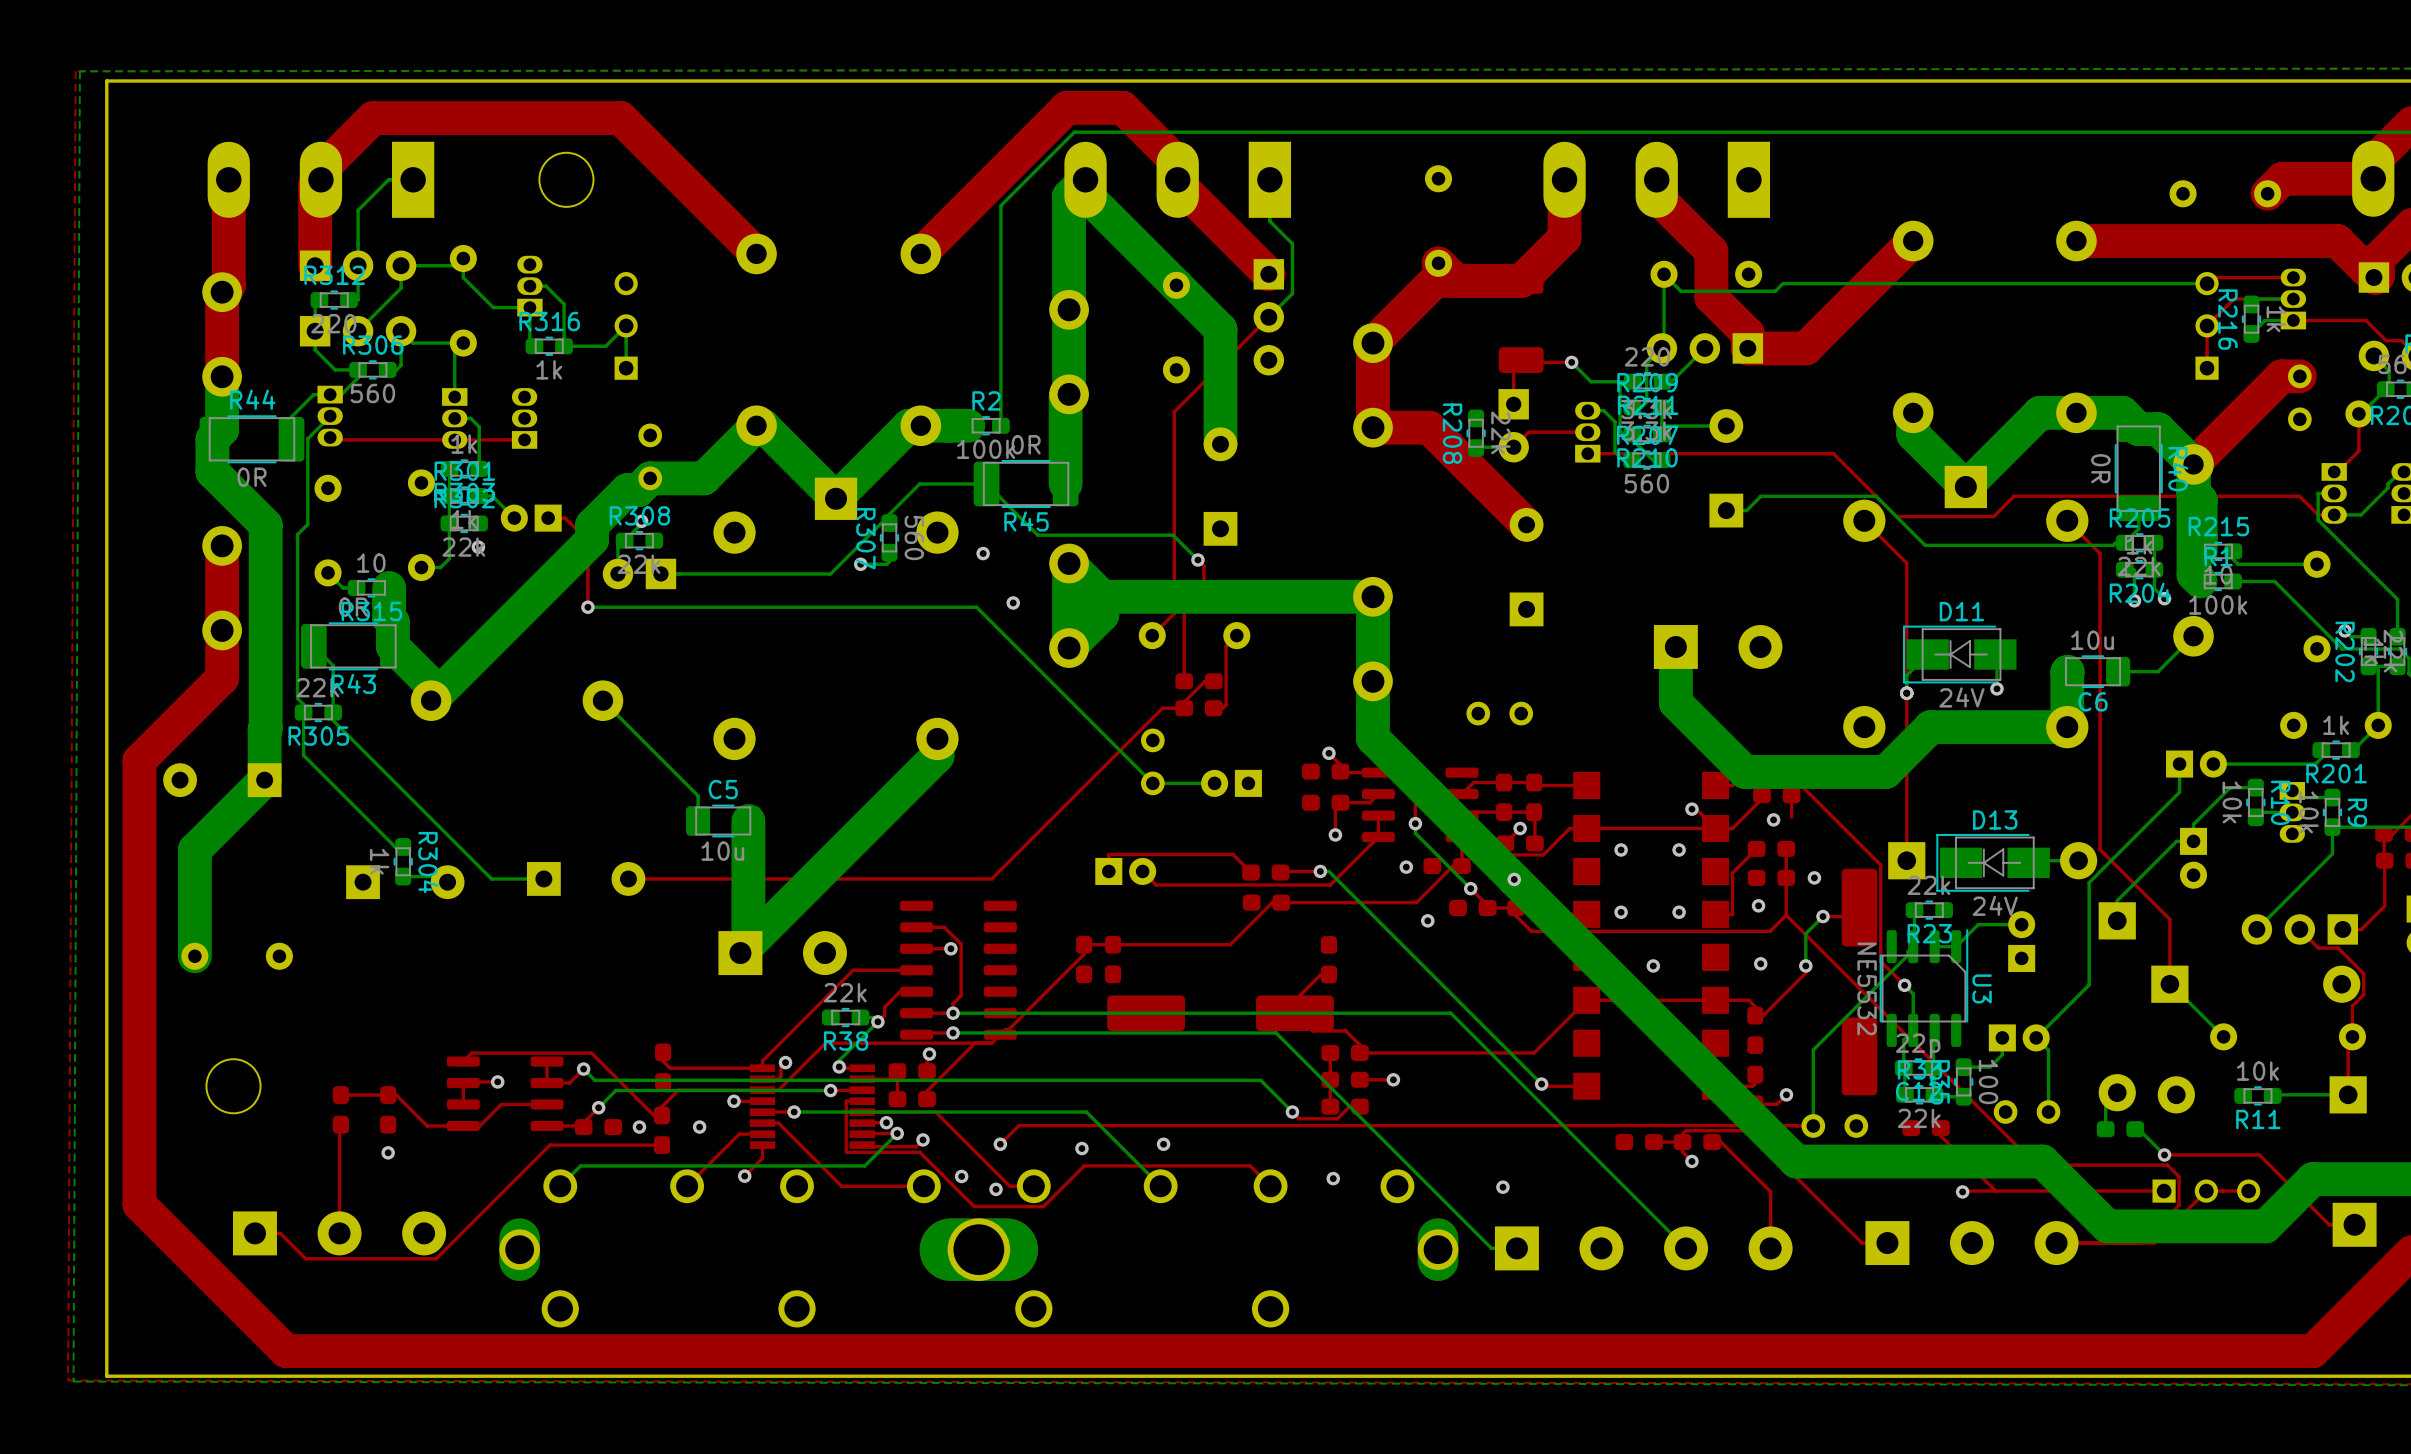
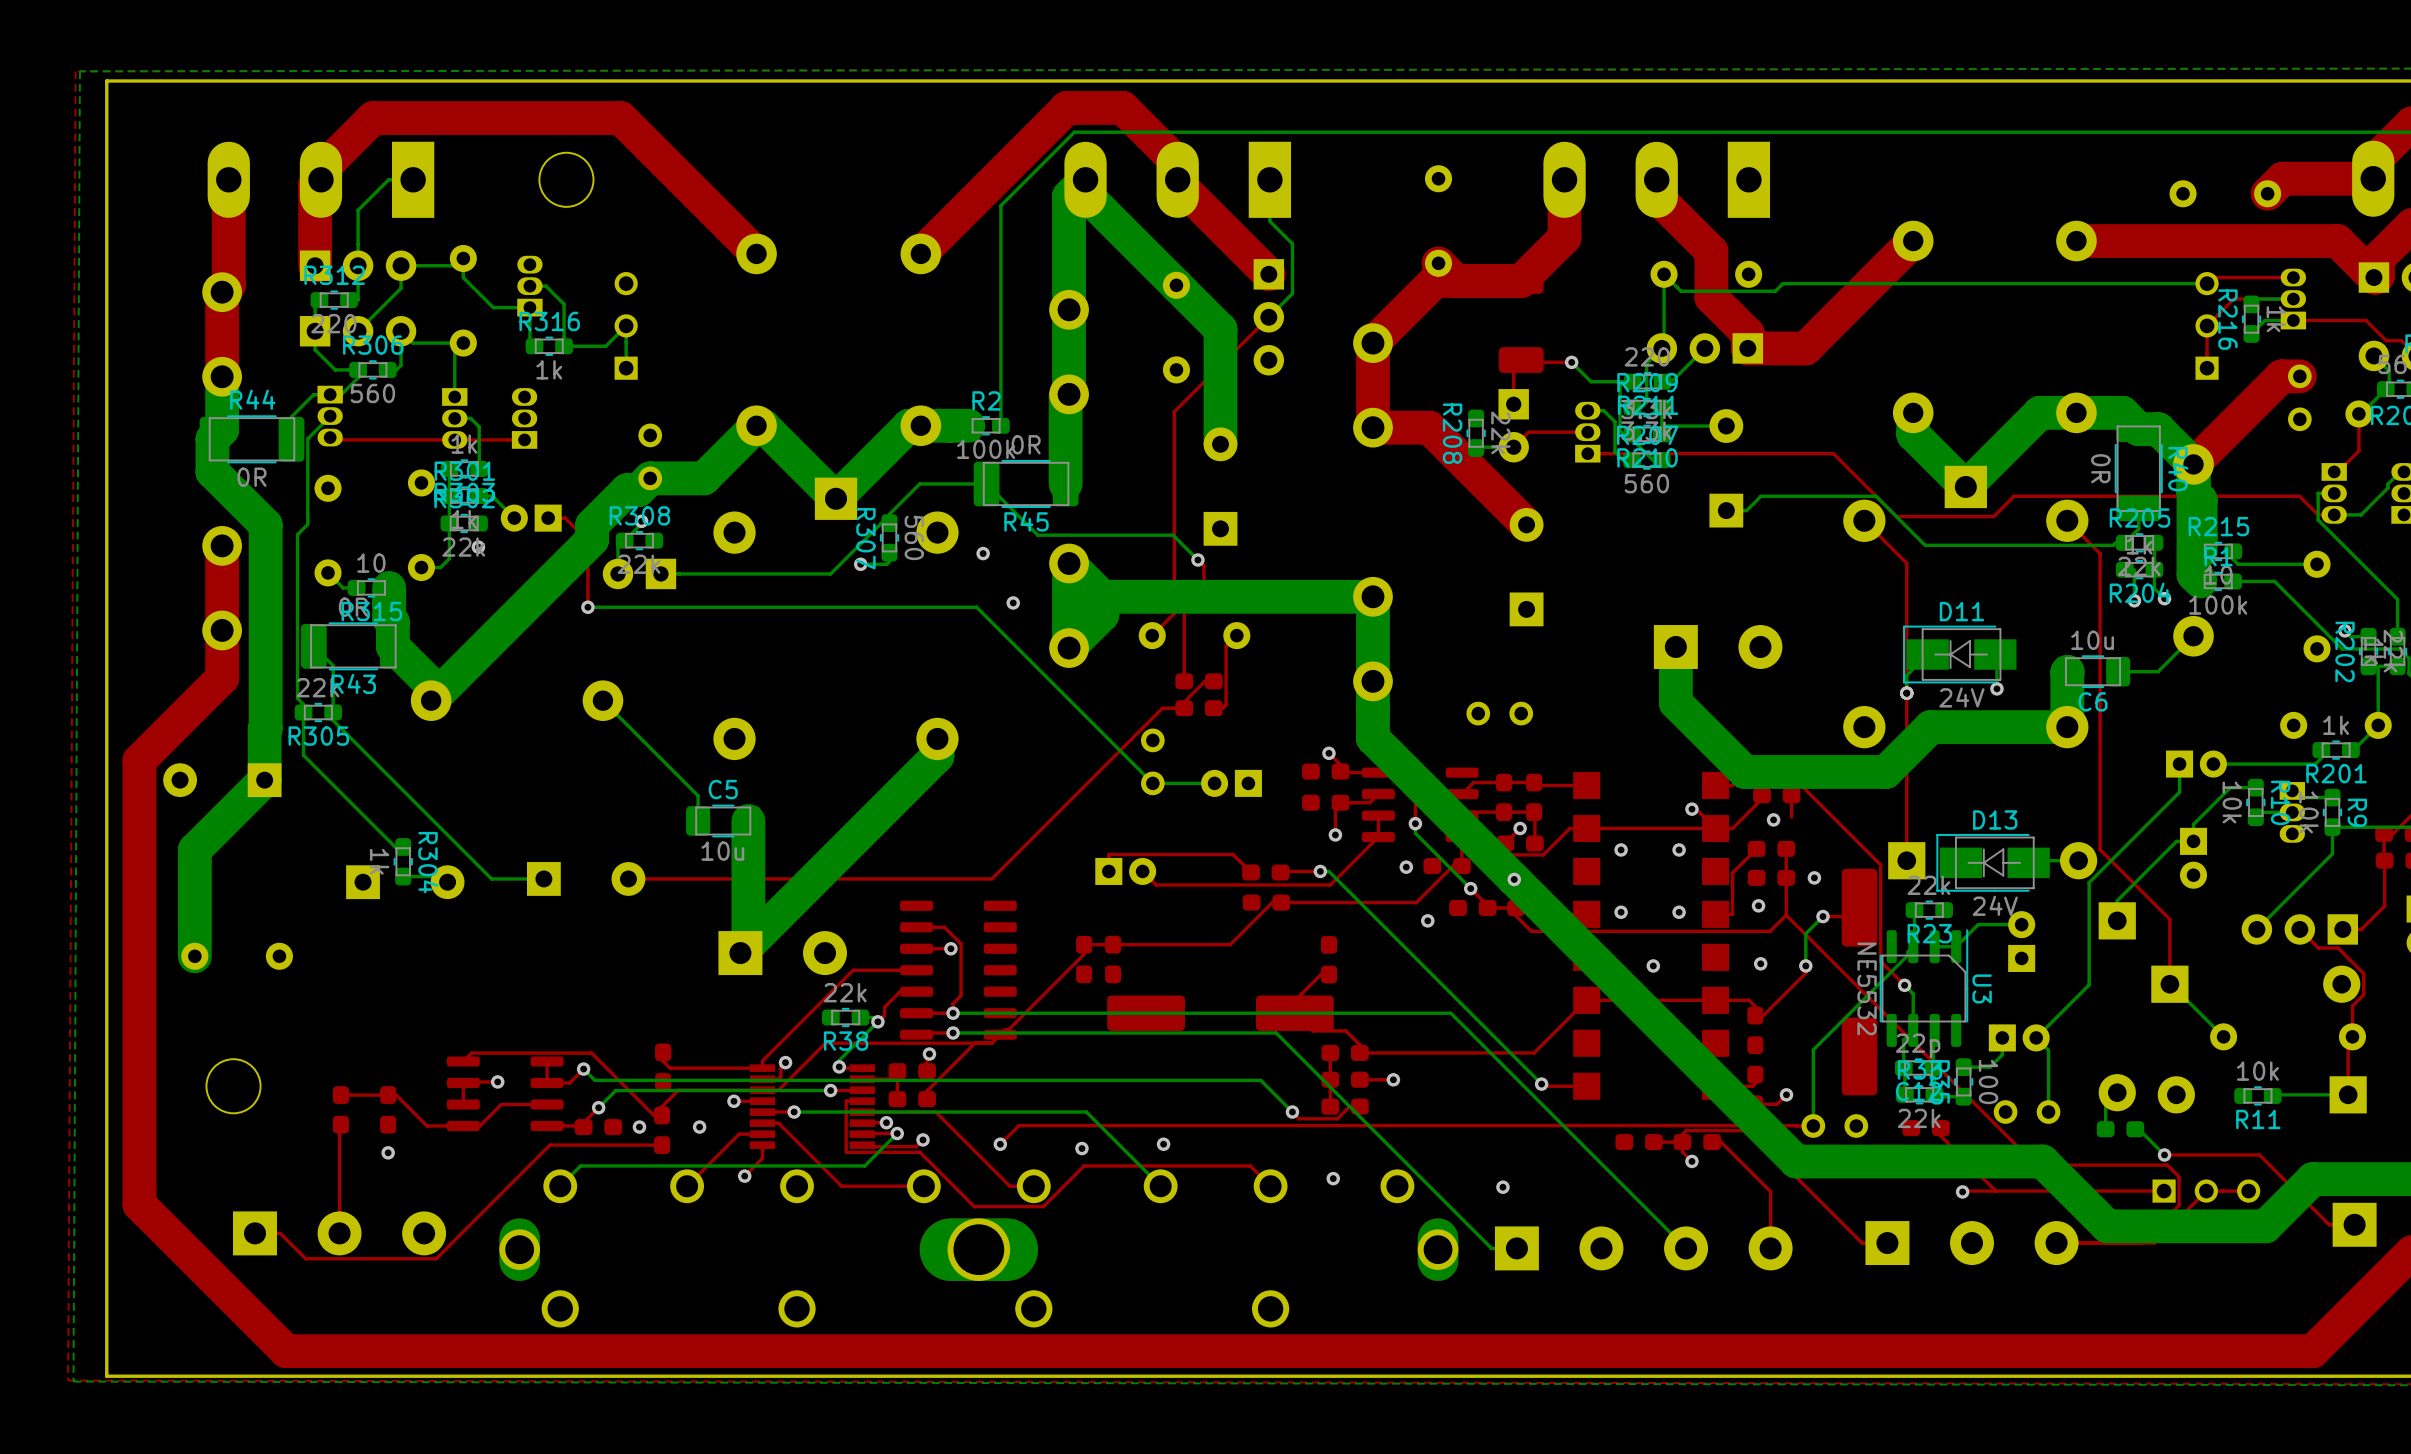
via: (961, 1176) -> none
via: (996, 1189) -> none

